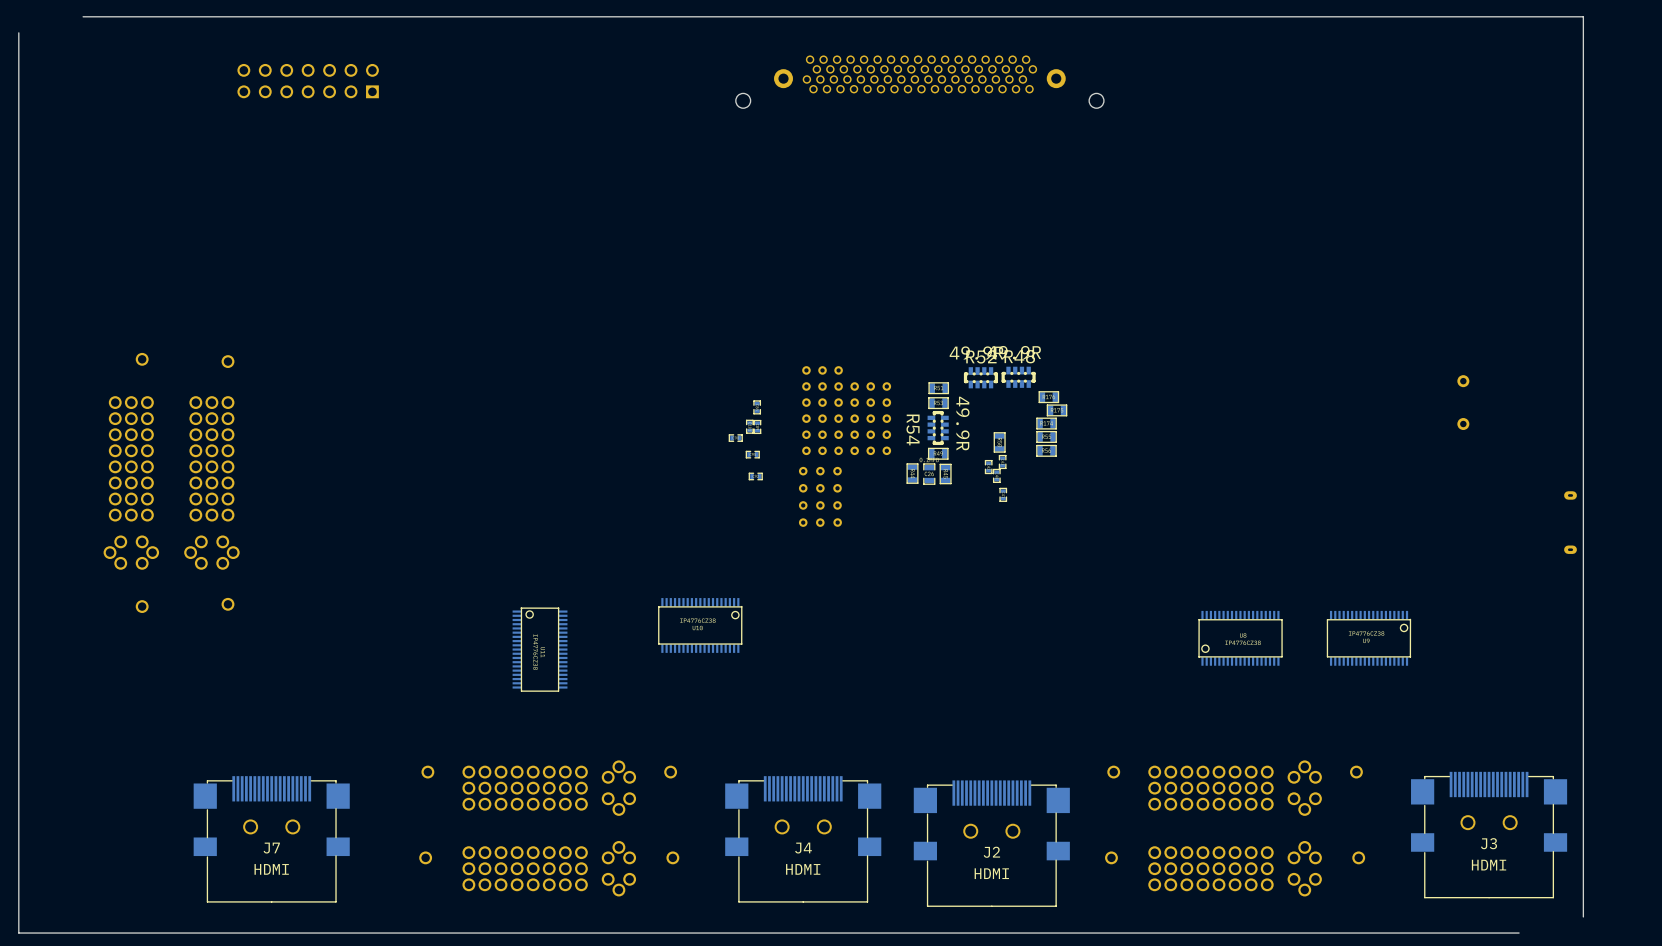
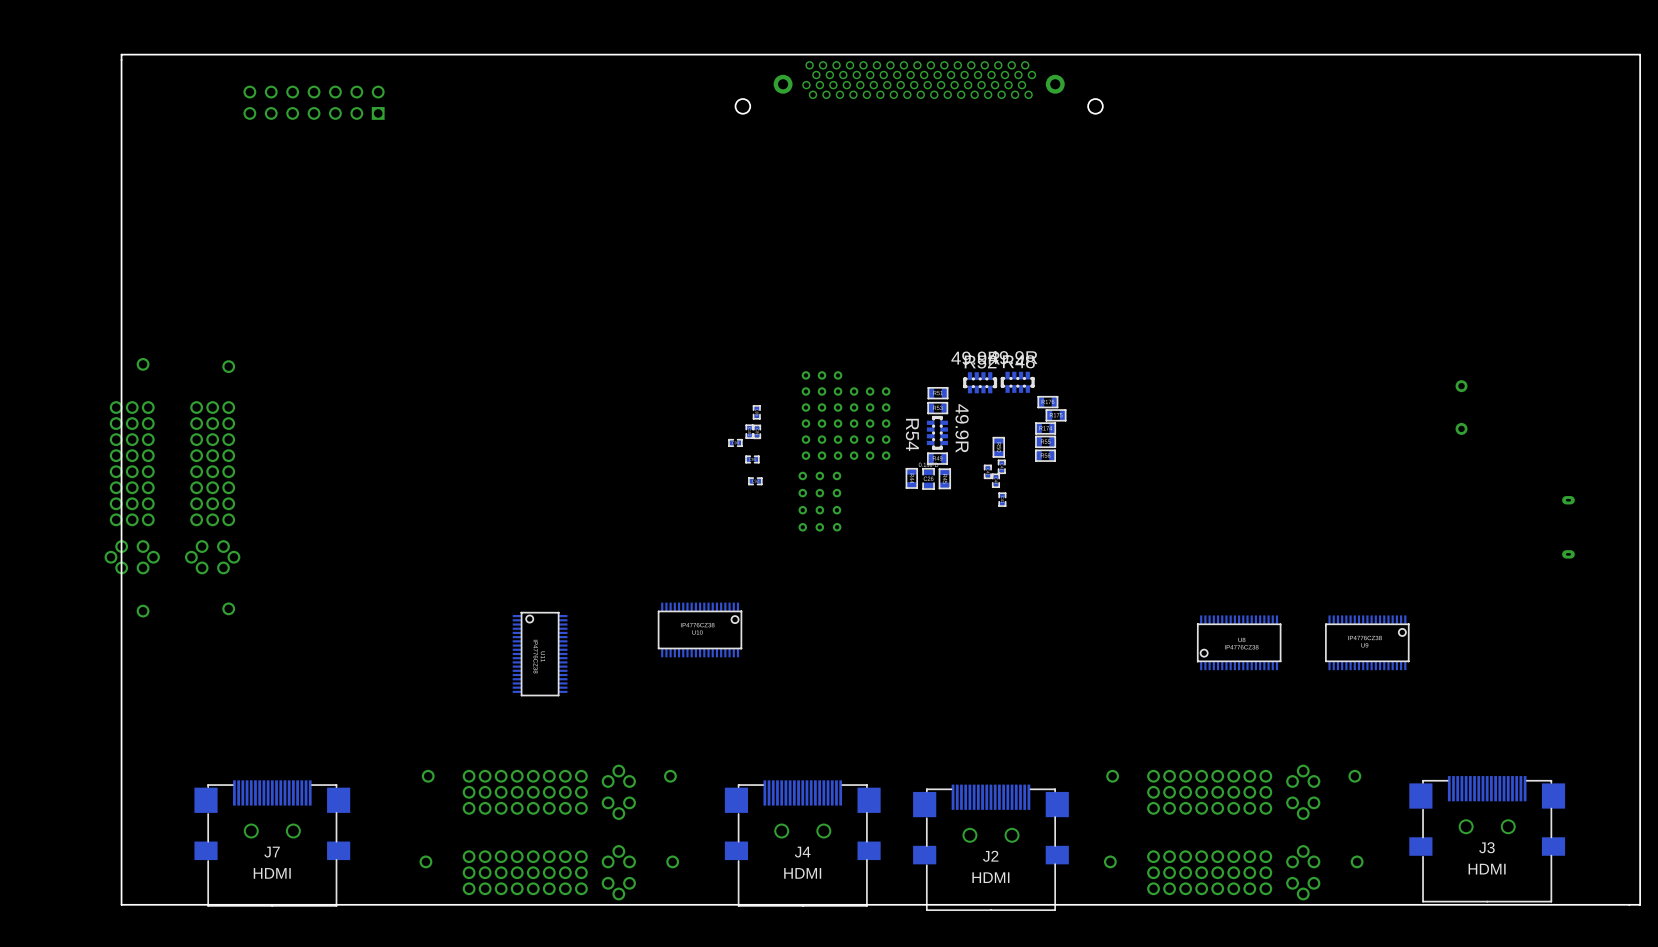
board edge: (83, 16) (1583, 16) (1583, 916) -> none
board edge: (18, 32) (18, 933) (1519, 933) -> none
board edge: none -> (1640, 54) (1640, 904) (121, 904) (121, 54) (1640, 54)
part position: (308, 81) -> (314, 102)

